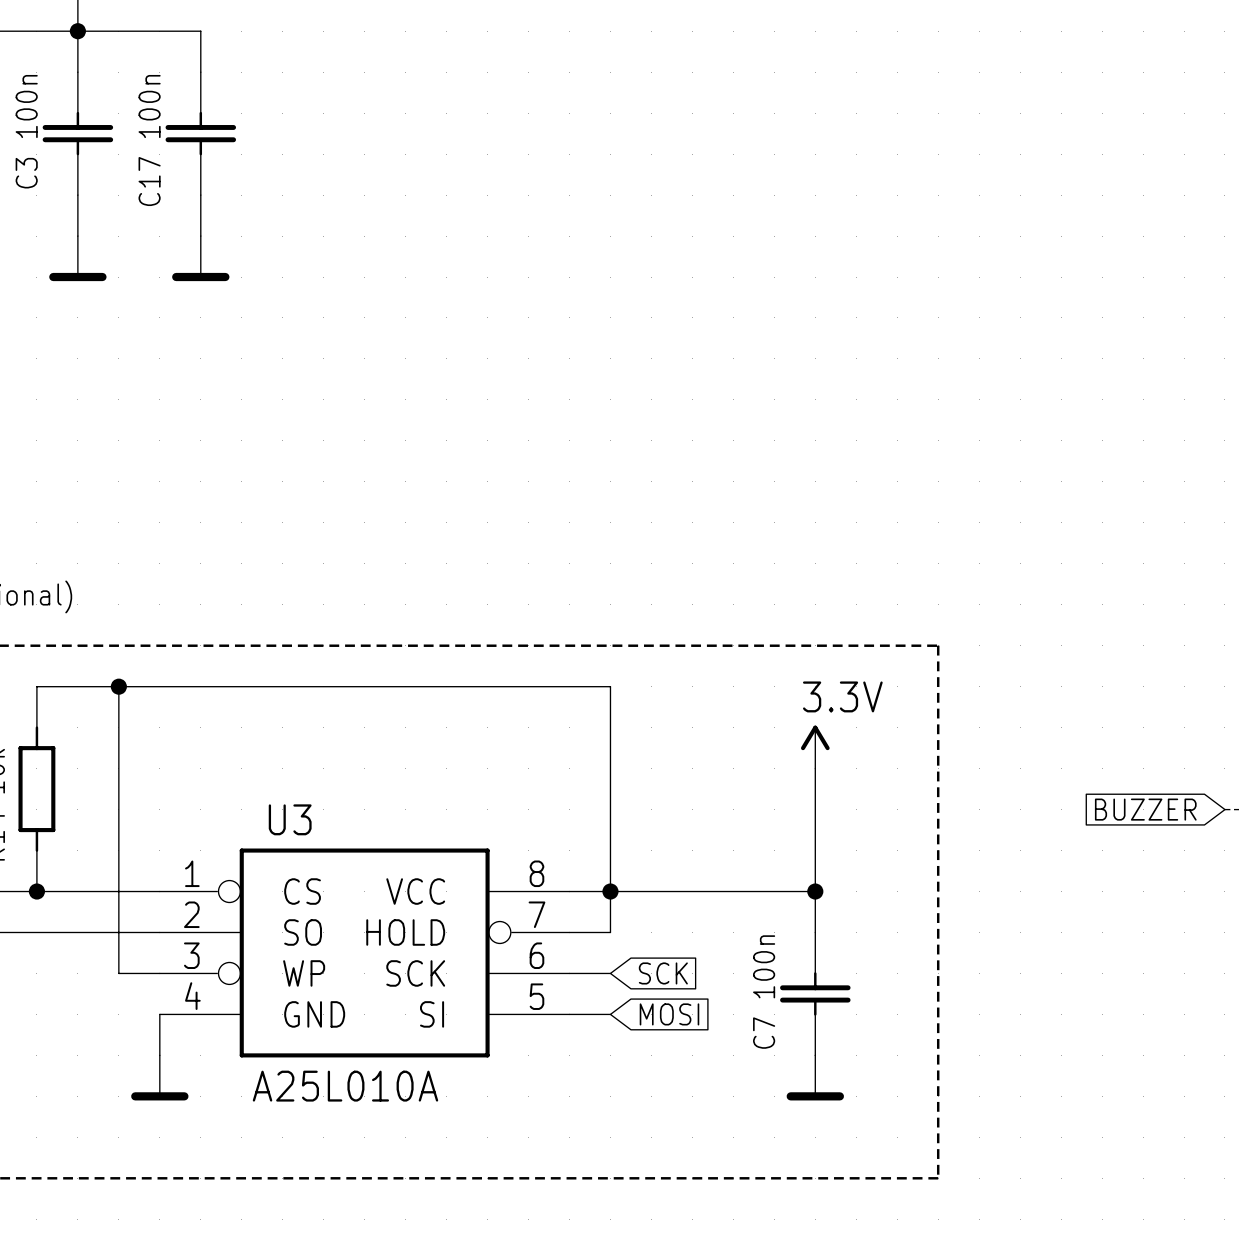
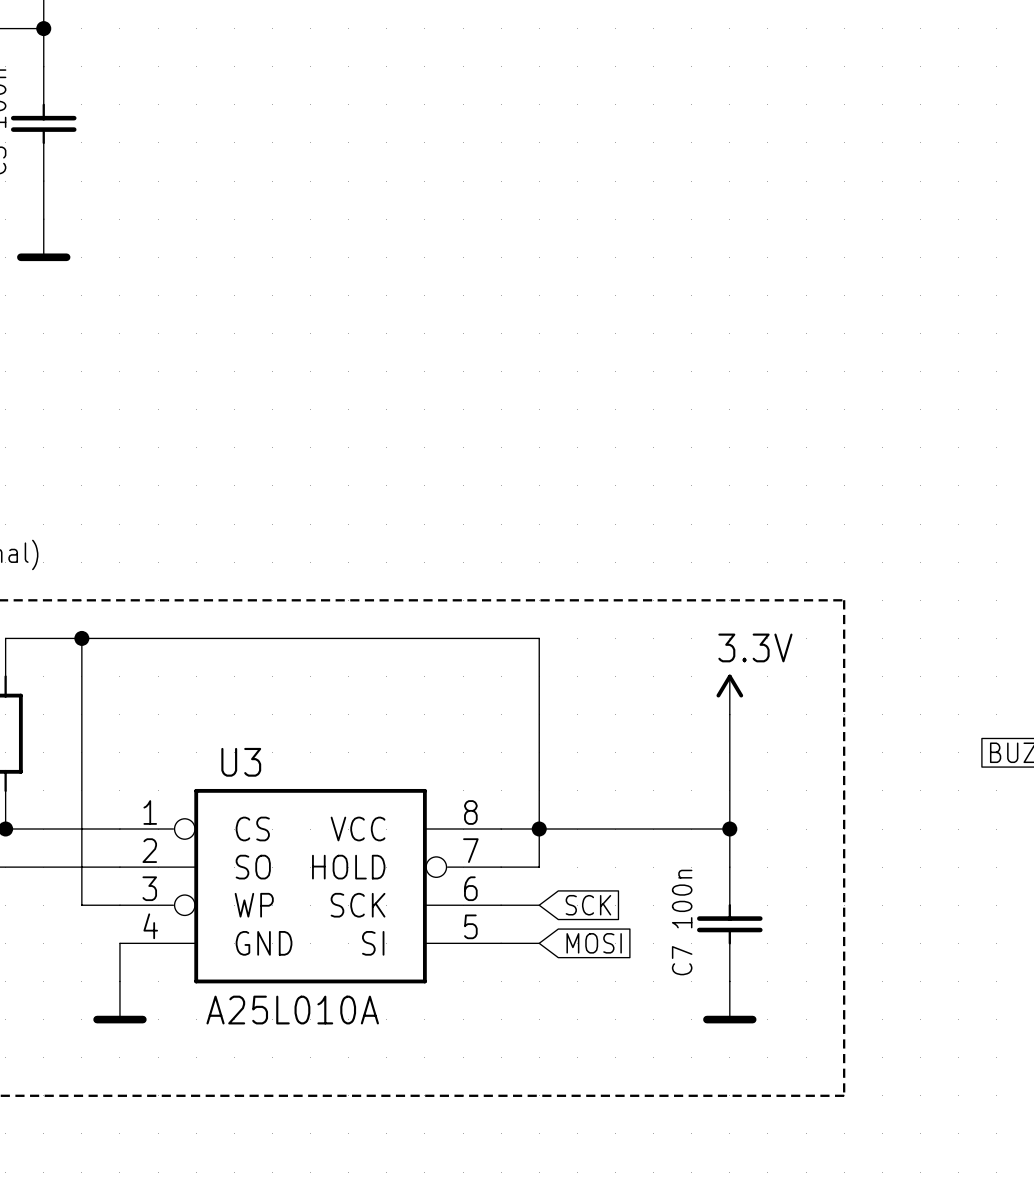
wire: (77, 31) (200, 31) (200, 72) -> none
C17: 100n (200, 133) -> none
wire: (200, 195) (200, 236) -> none
power symbol: (200, 258) -> none

